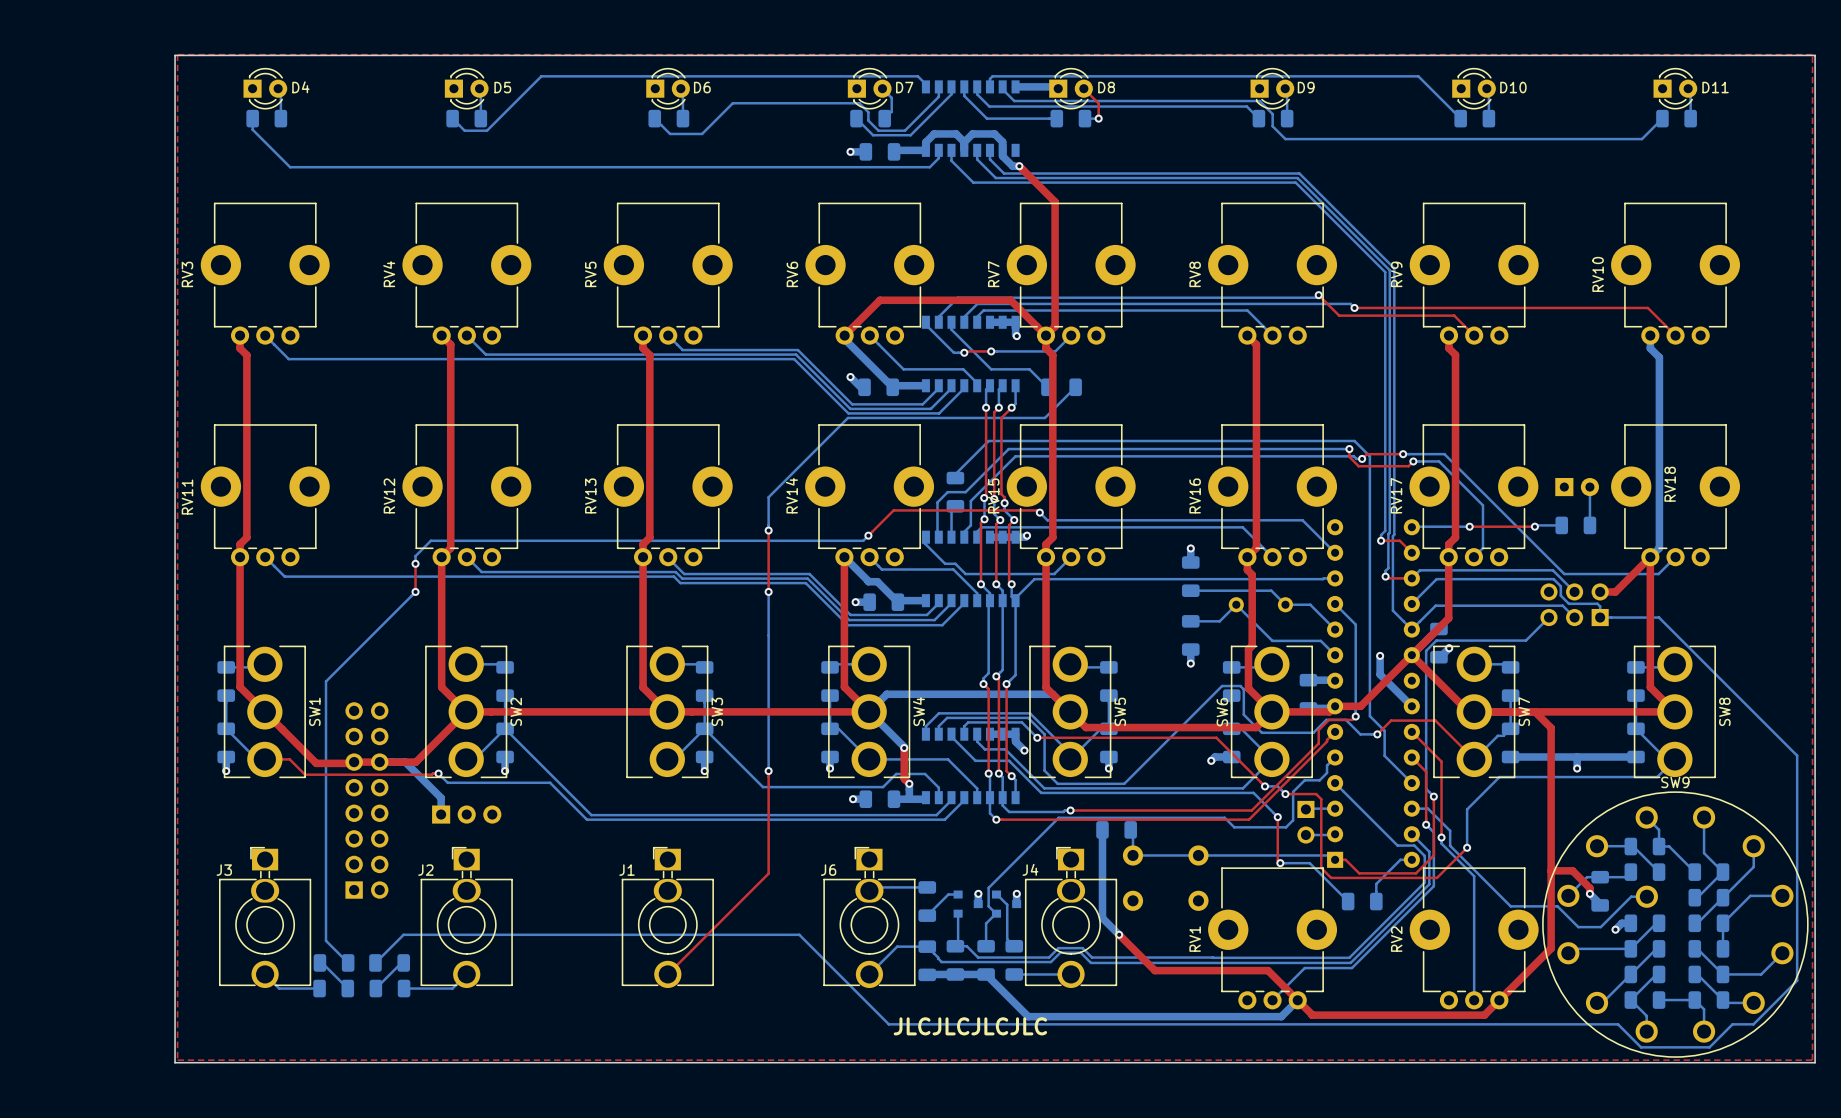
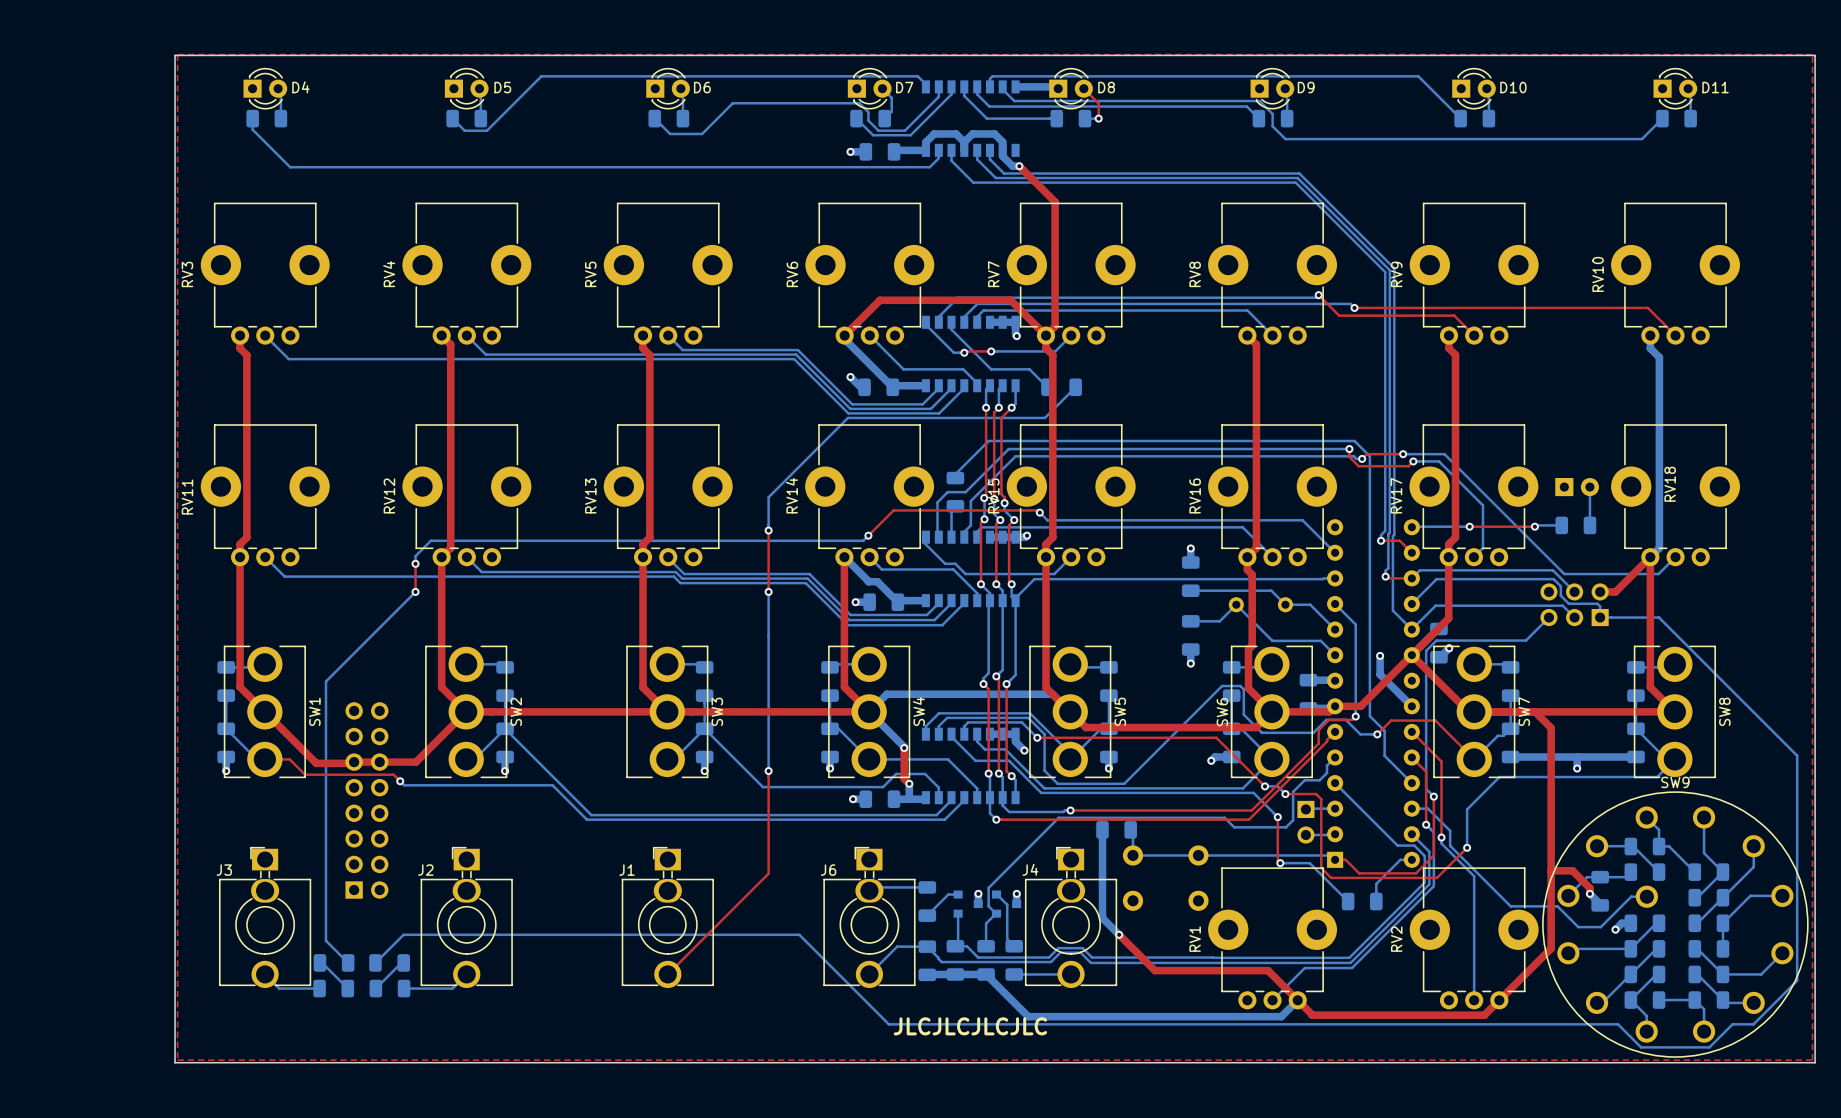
bottom track: (379, 762) (405, 762) (441, 797) (441, 814) -> none
bottom track: (438, 773) (447, 782) (550, 782) (552, 785) -> (400, 781) (404, 785) (552, 785)
top track: (438, 773) (393, 774) -> (400, 781) (393, 774)
via position: (438, 773) -> (400, 781)
part: (466, 814) -> none

